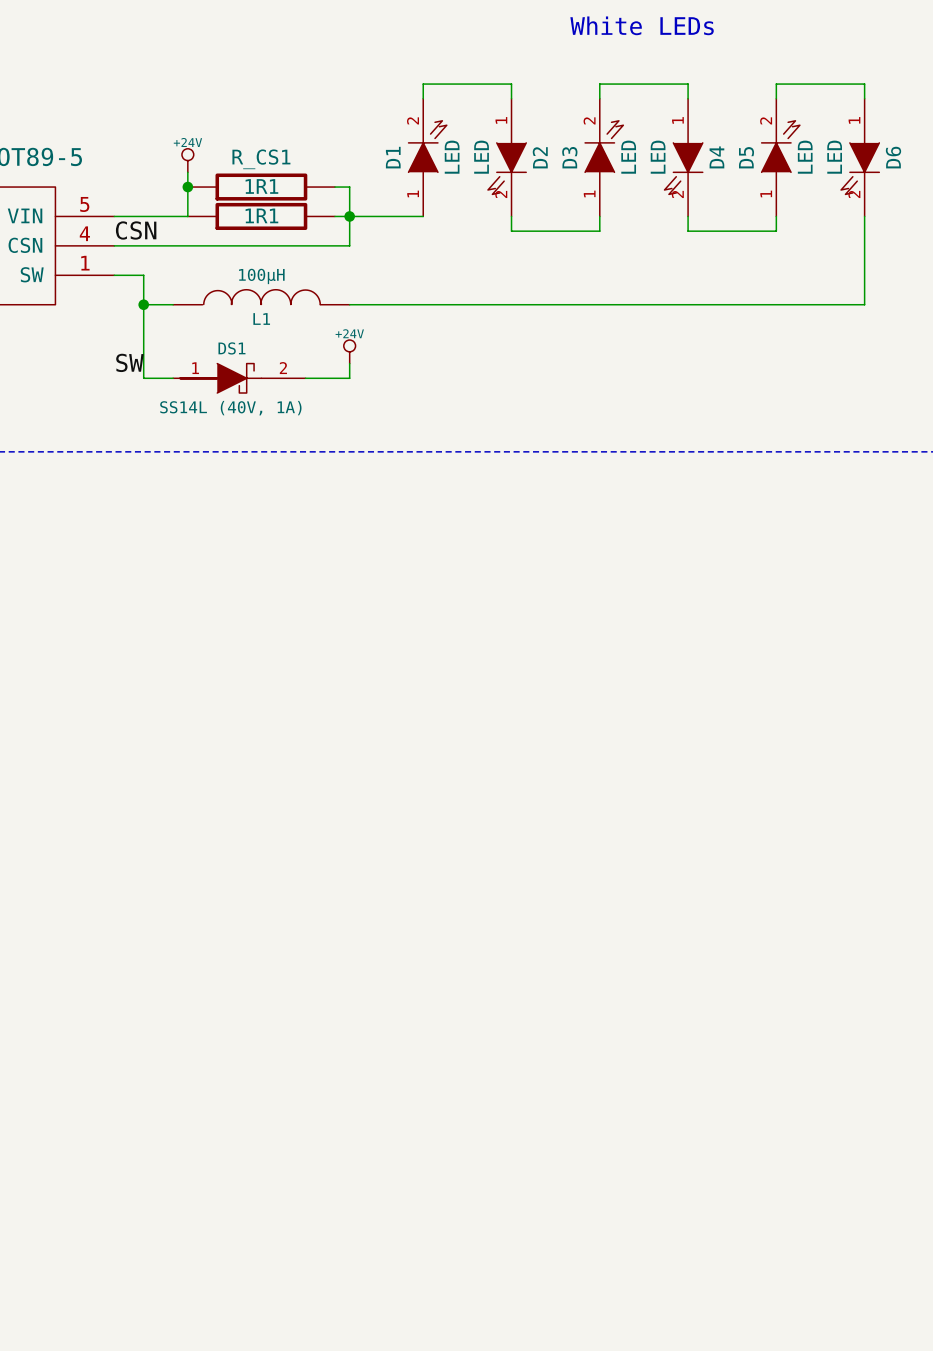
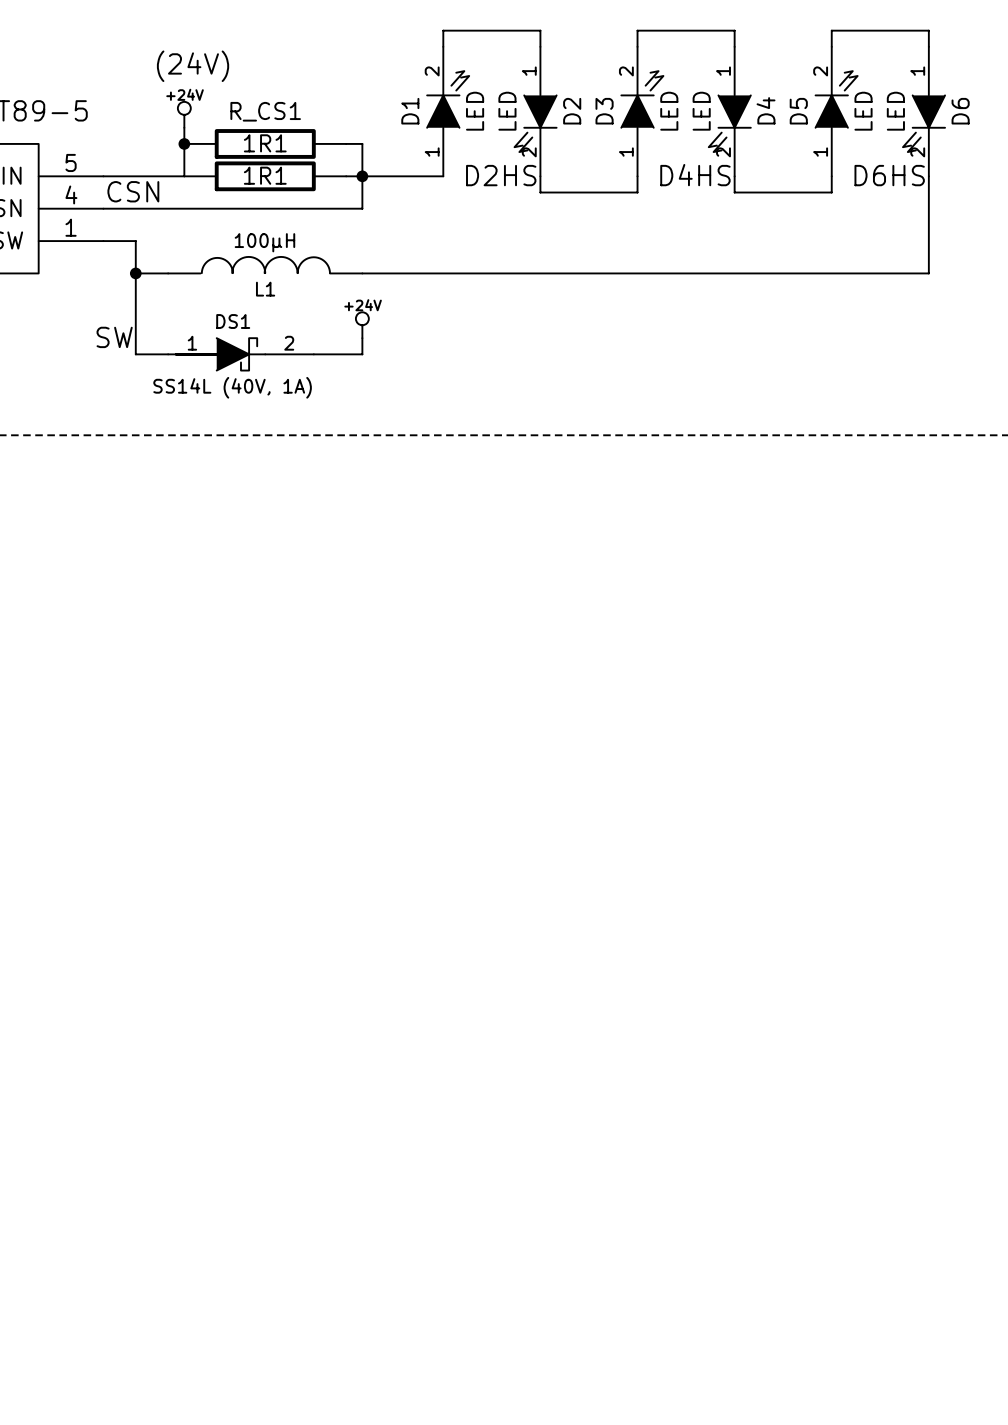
text: none -> (24V) (193, 66)
label: none -> D2HS (501, 175)
label: none -> D4HS (695, 175)
label: none -> D6HS (889, 175)

